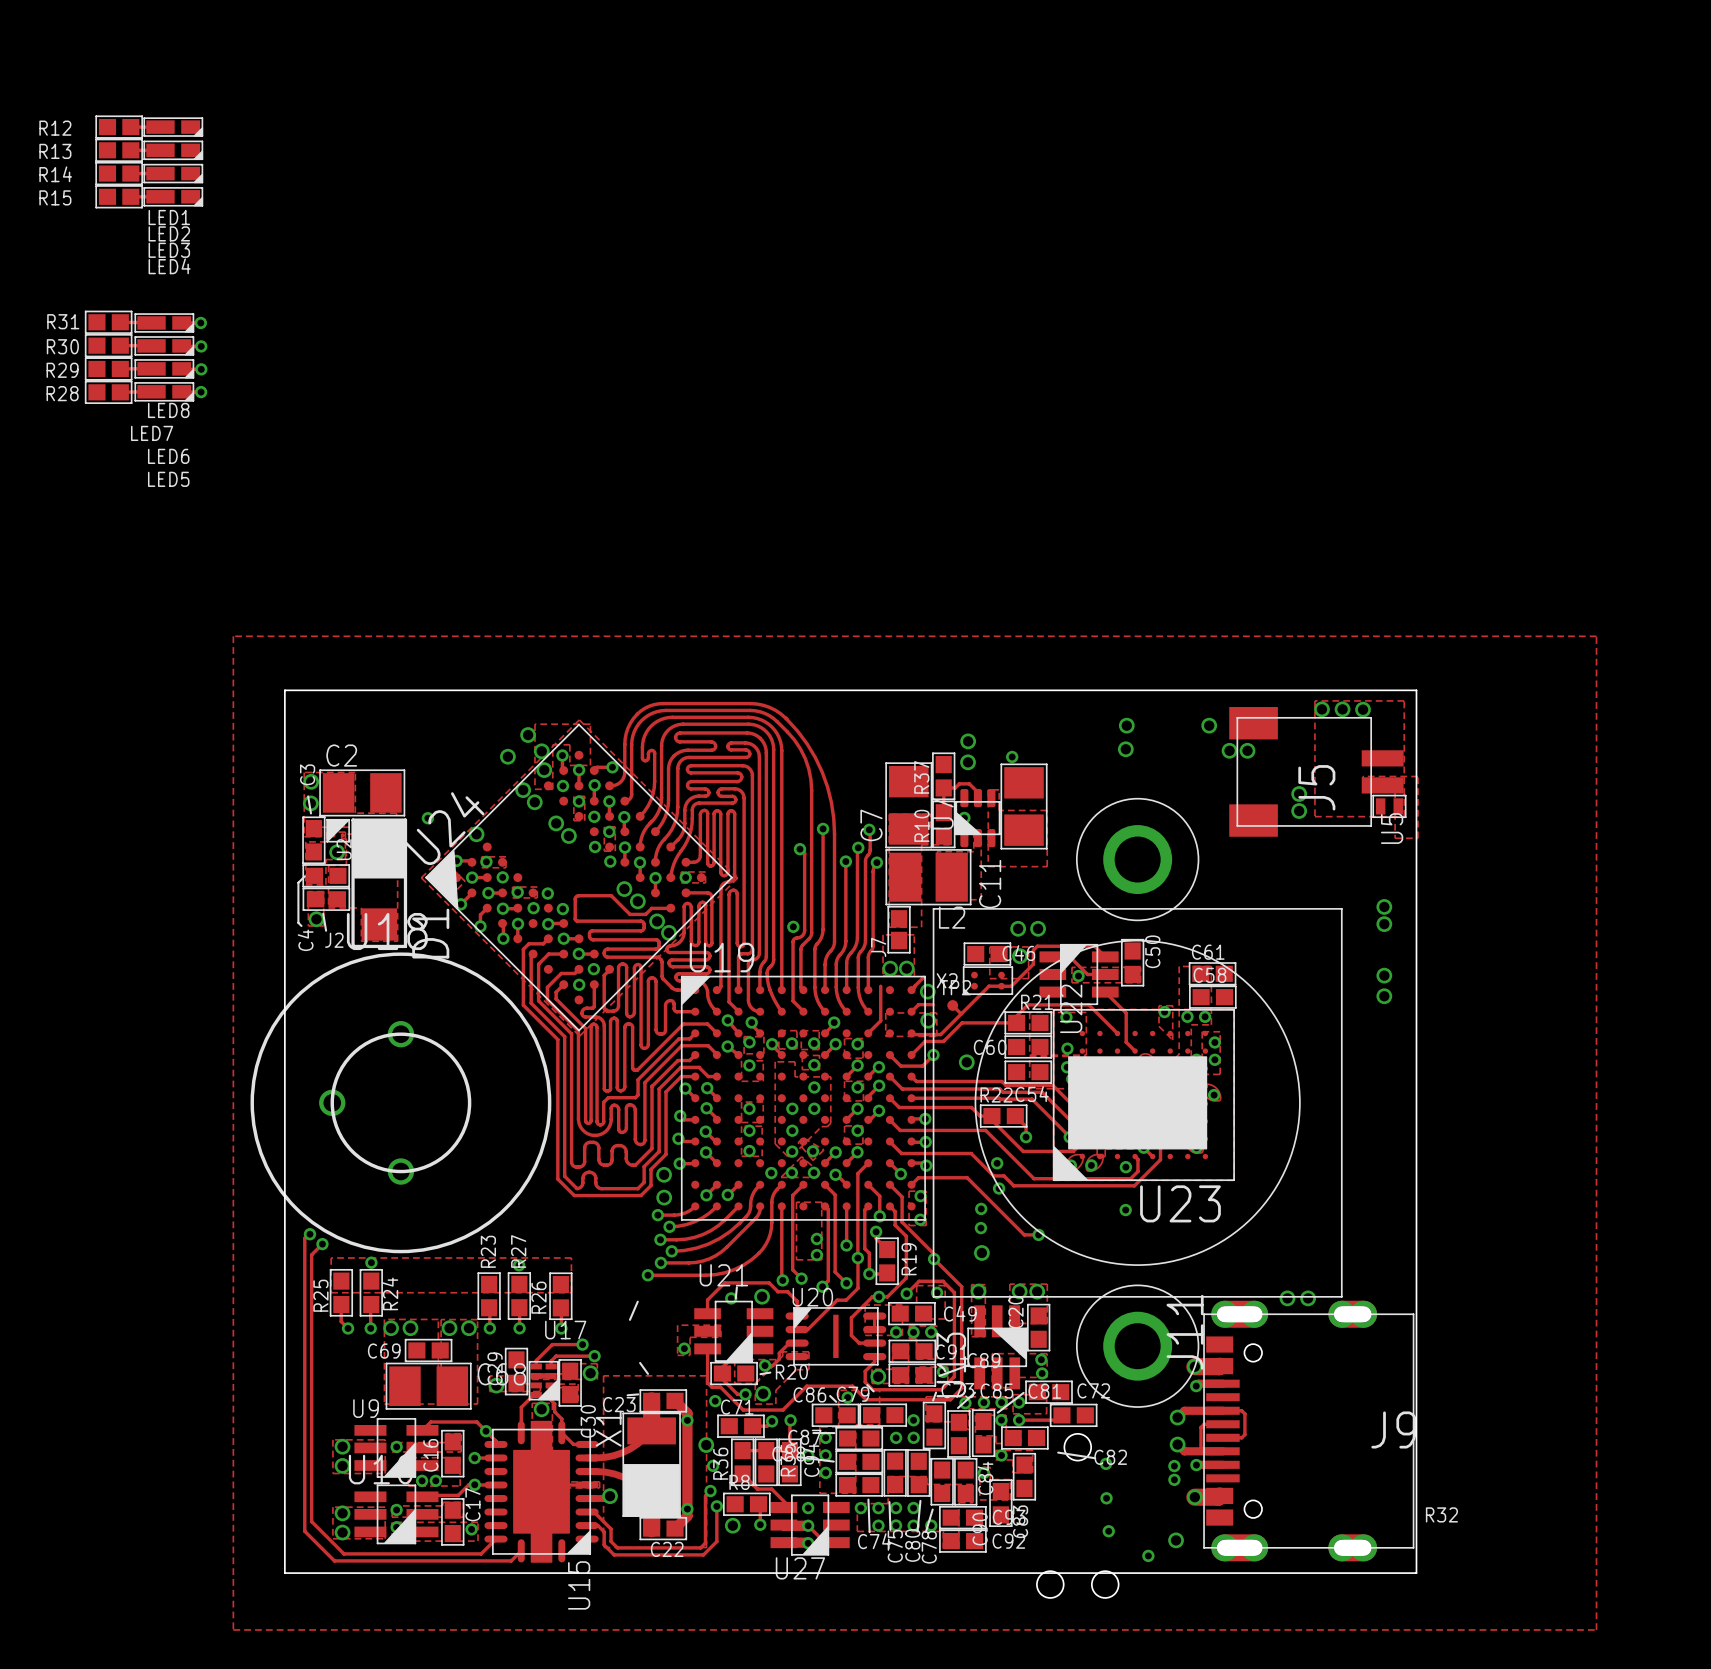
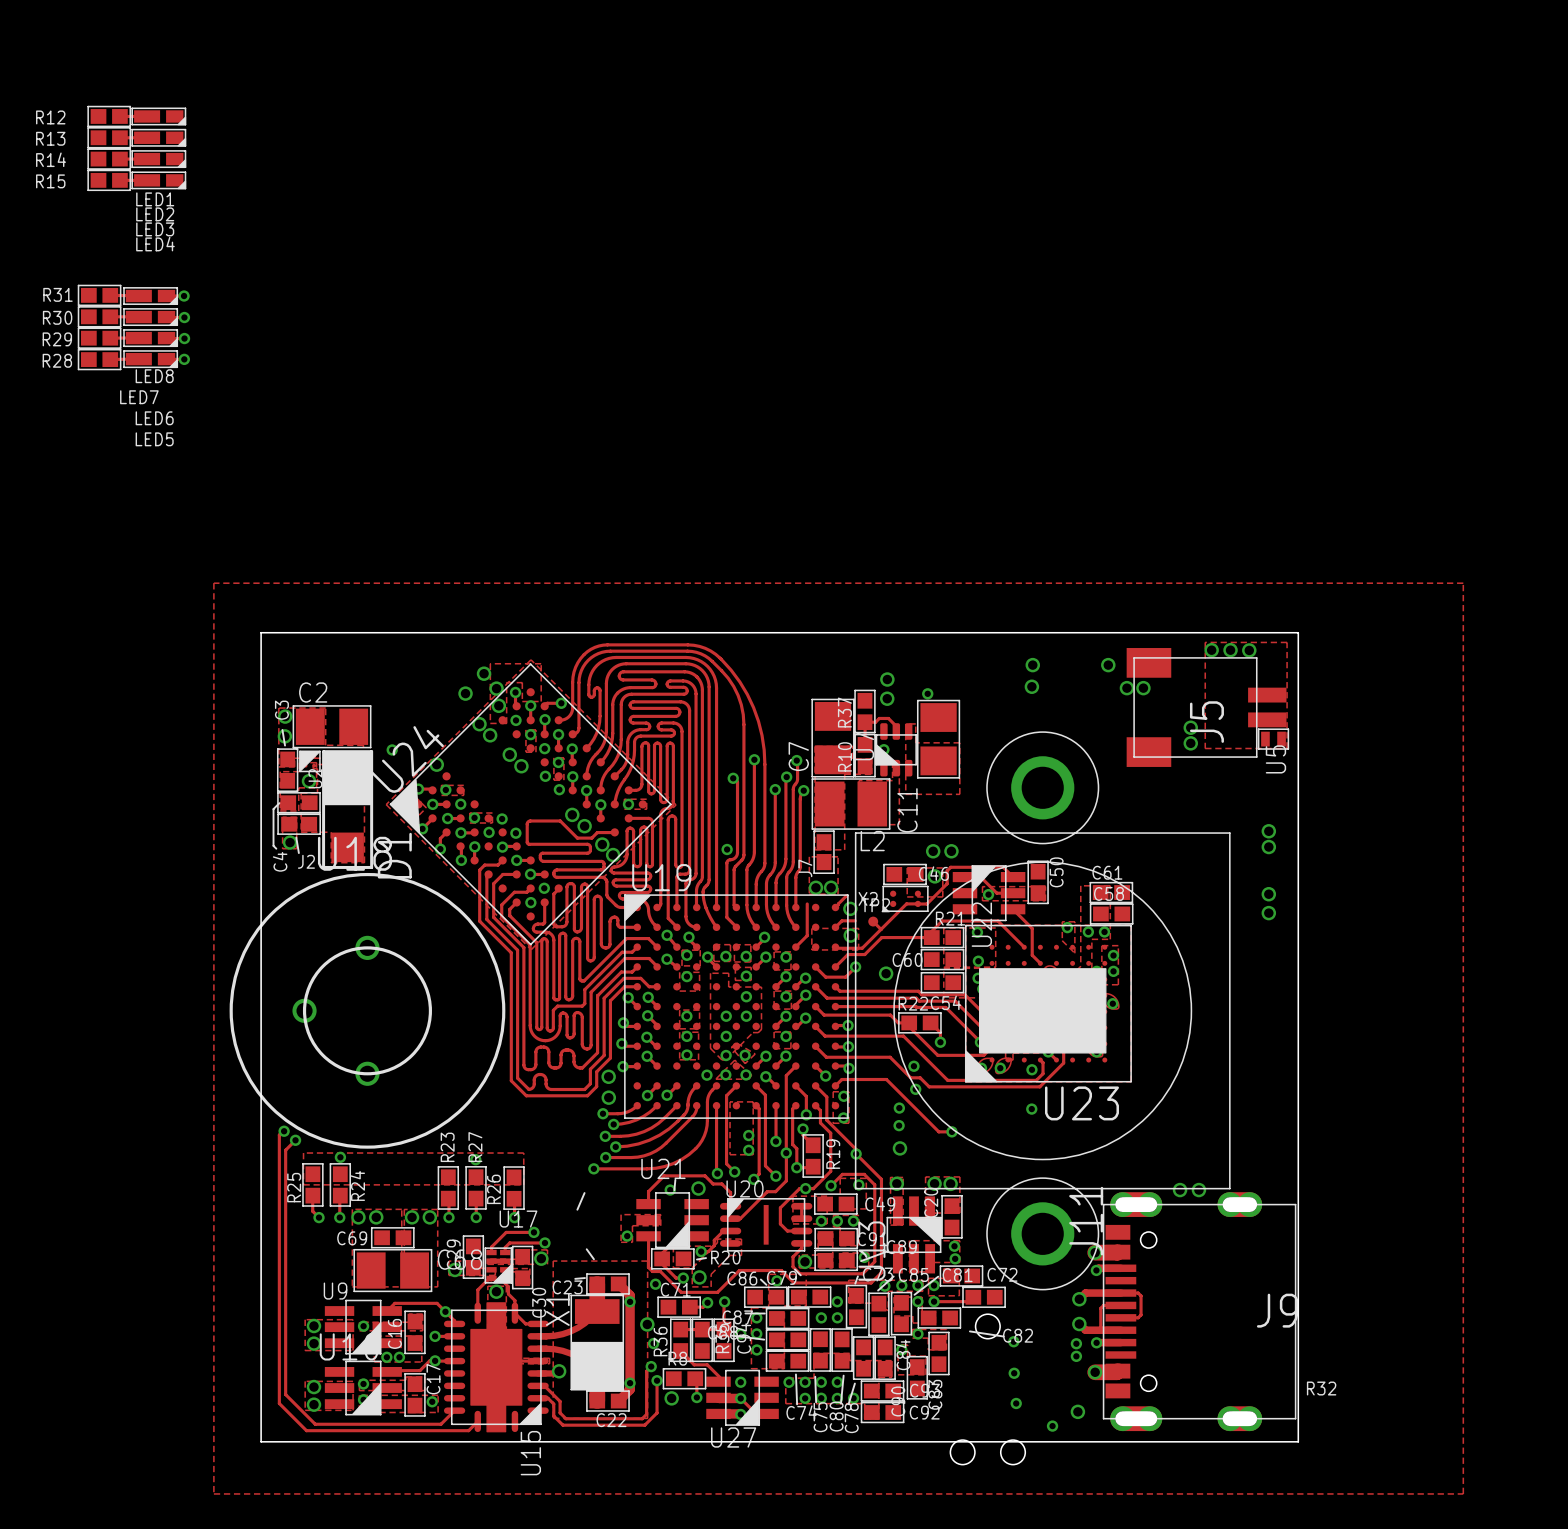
zone outline: (1363, 776) (1363, 791) (1395, 791) (1395, 838) (1417, 838) (1417, 776) (1363, 776) -> none

